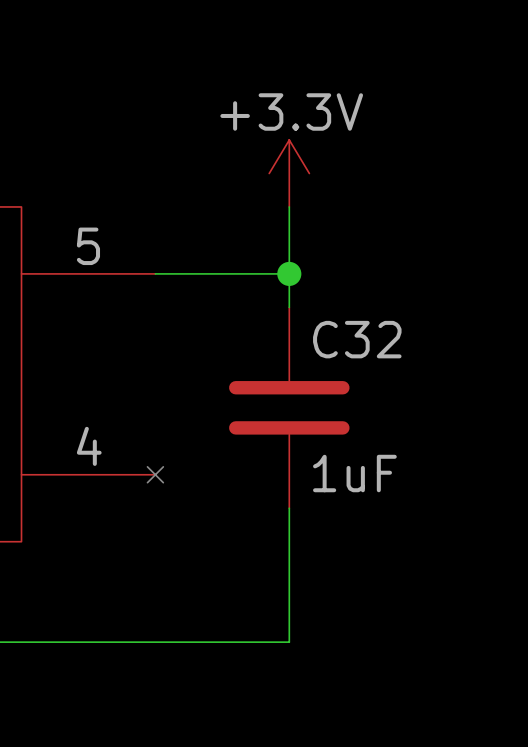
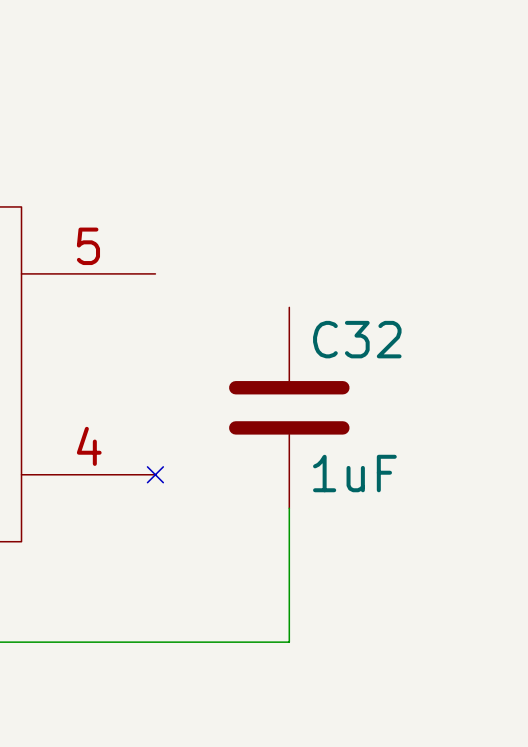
power symbol: +3.3V (289, 173) -> none
wire: (289, 206) (289, 307) -> none
wire: (155, 273) (289, 273) -> none
junction: (289, 273) -> none

